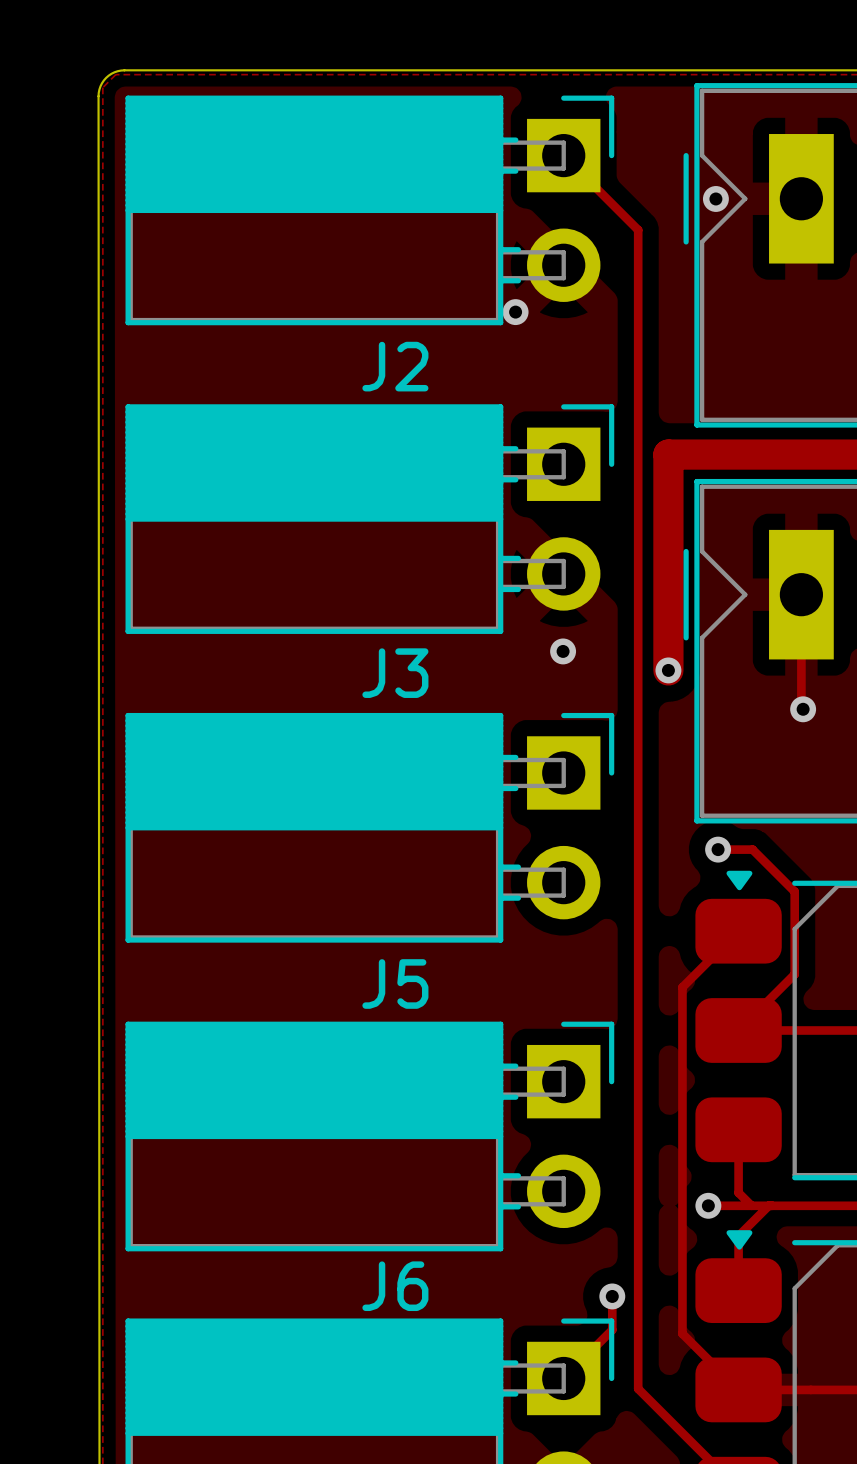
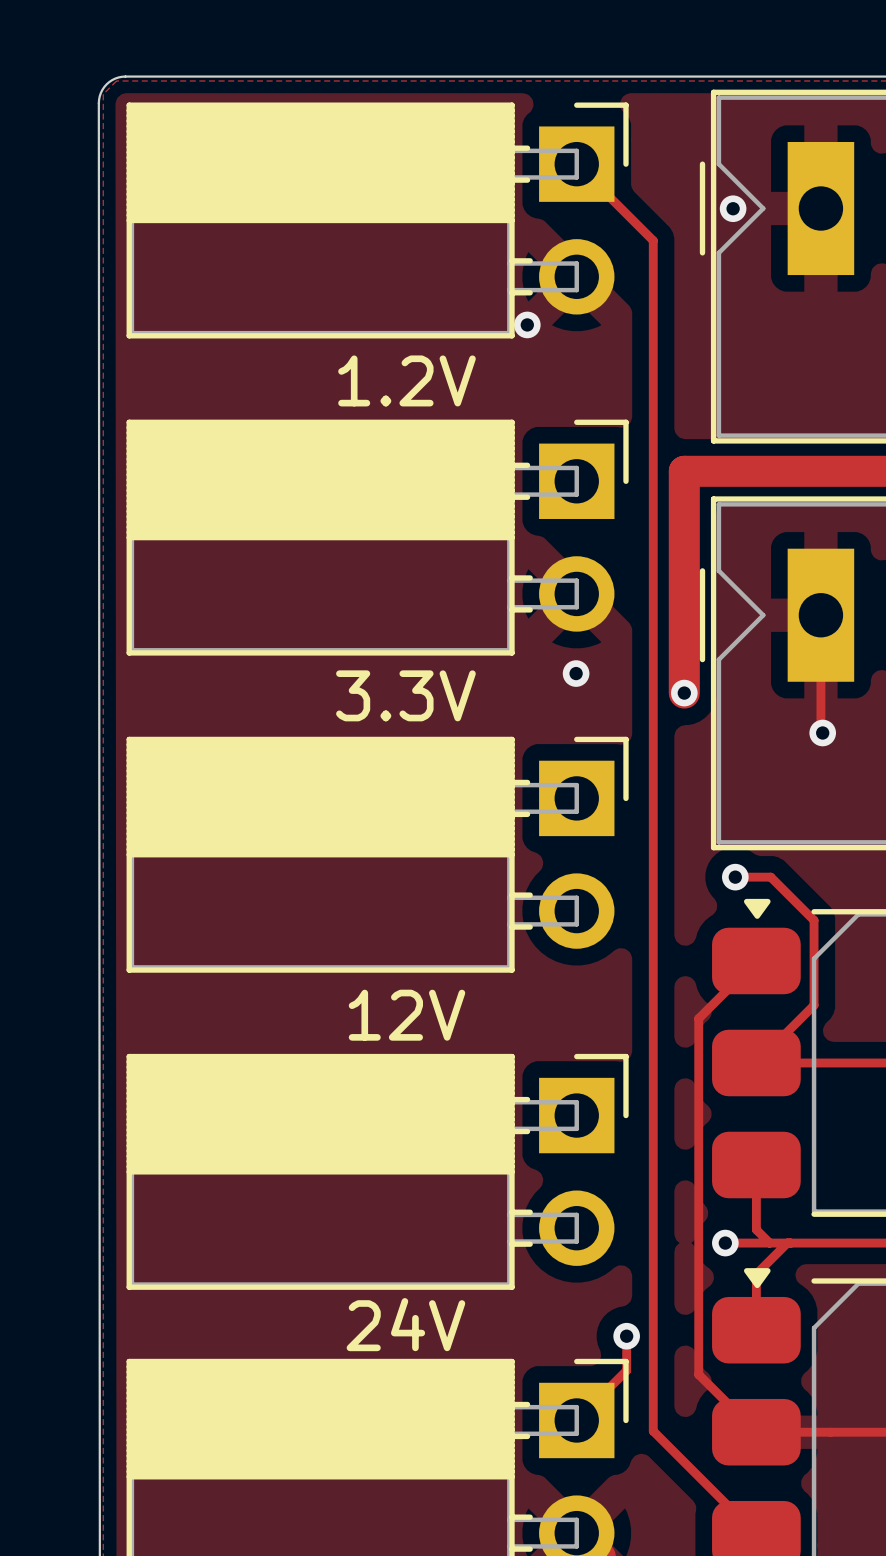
J2 name: J2 (395, 366) -> 1.2V (407, 380)
J3 name: J3 (395, 673) -> 3.3V (405, 695)
J5 name: J5 (395, 983) -> 12V (407, 1015)
J6 name: J6 (395, 1286) -> 24V (405, 1324)

